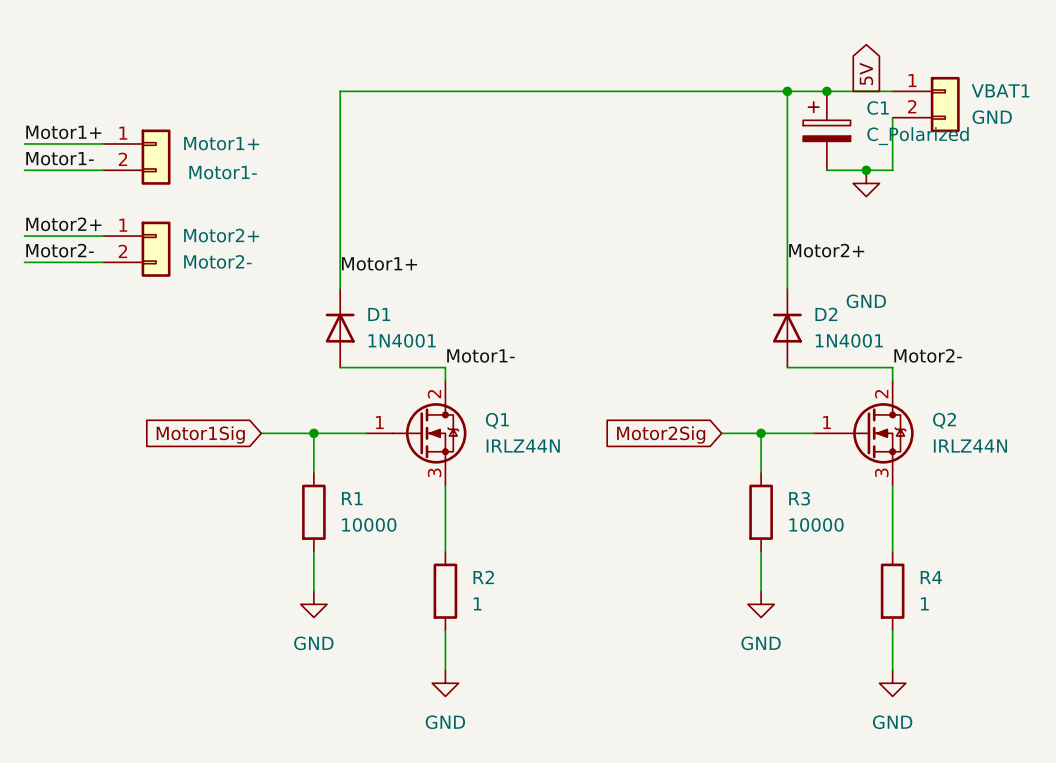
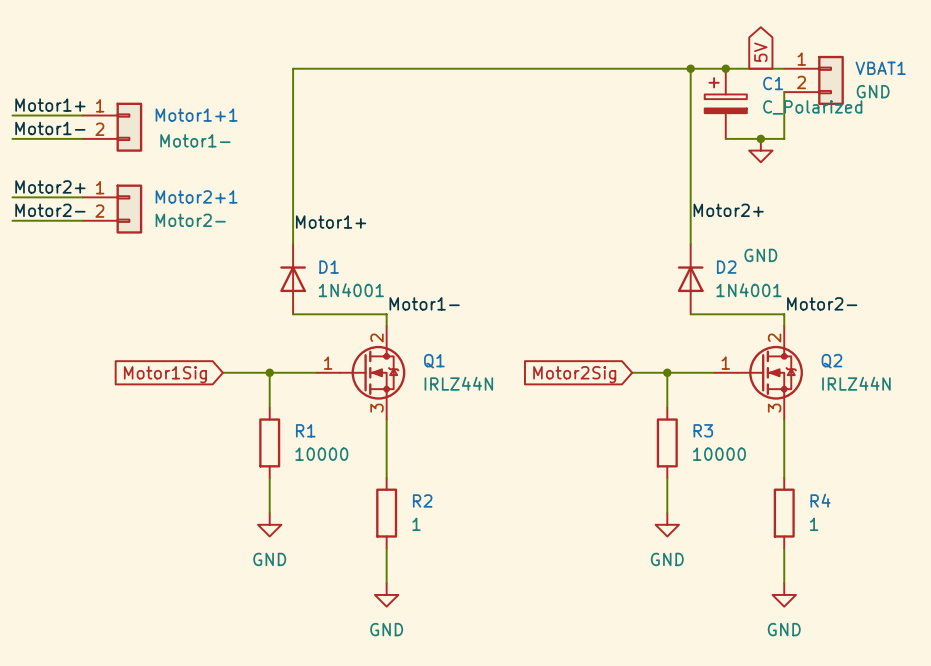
Motor1+ name: Motor1+ (221, 143) -> Motor1+1 (196, 115)
Motor2+ name: Motor2+ (221, 235) -> Motor2+1 (196, 196)

